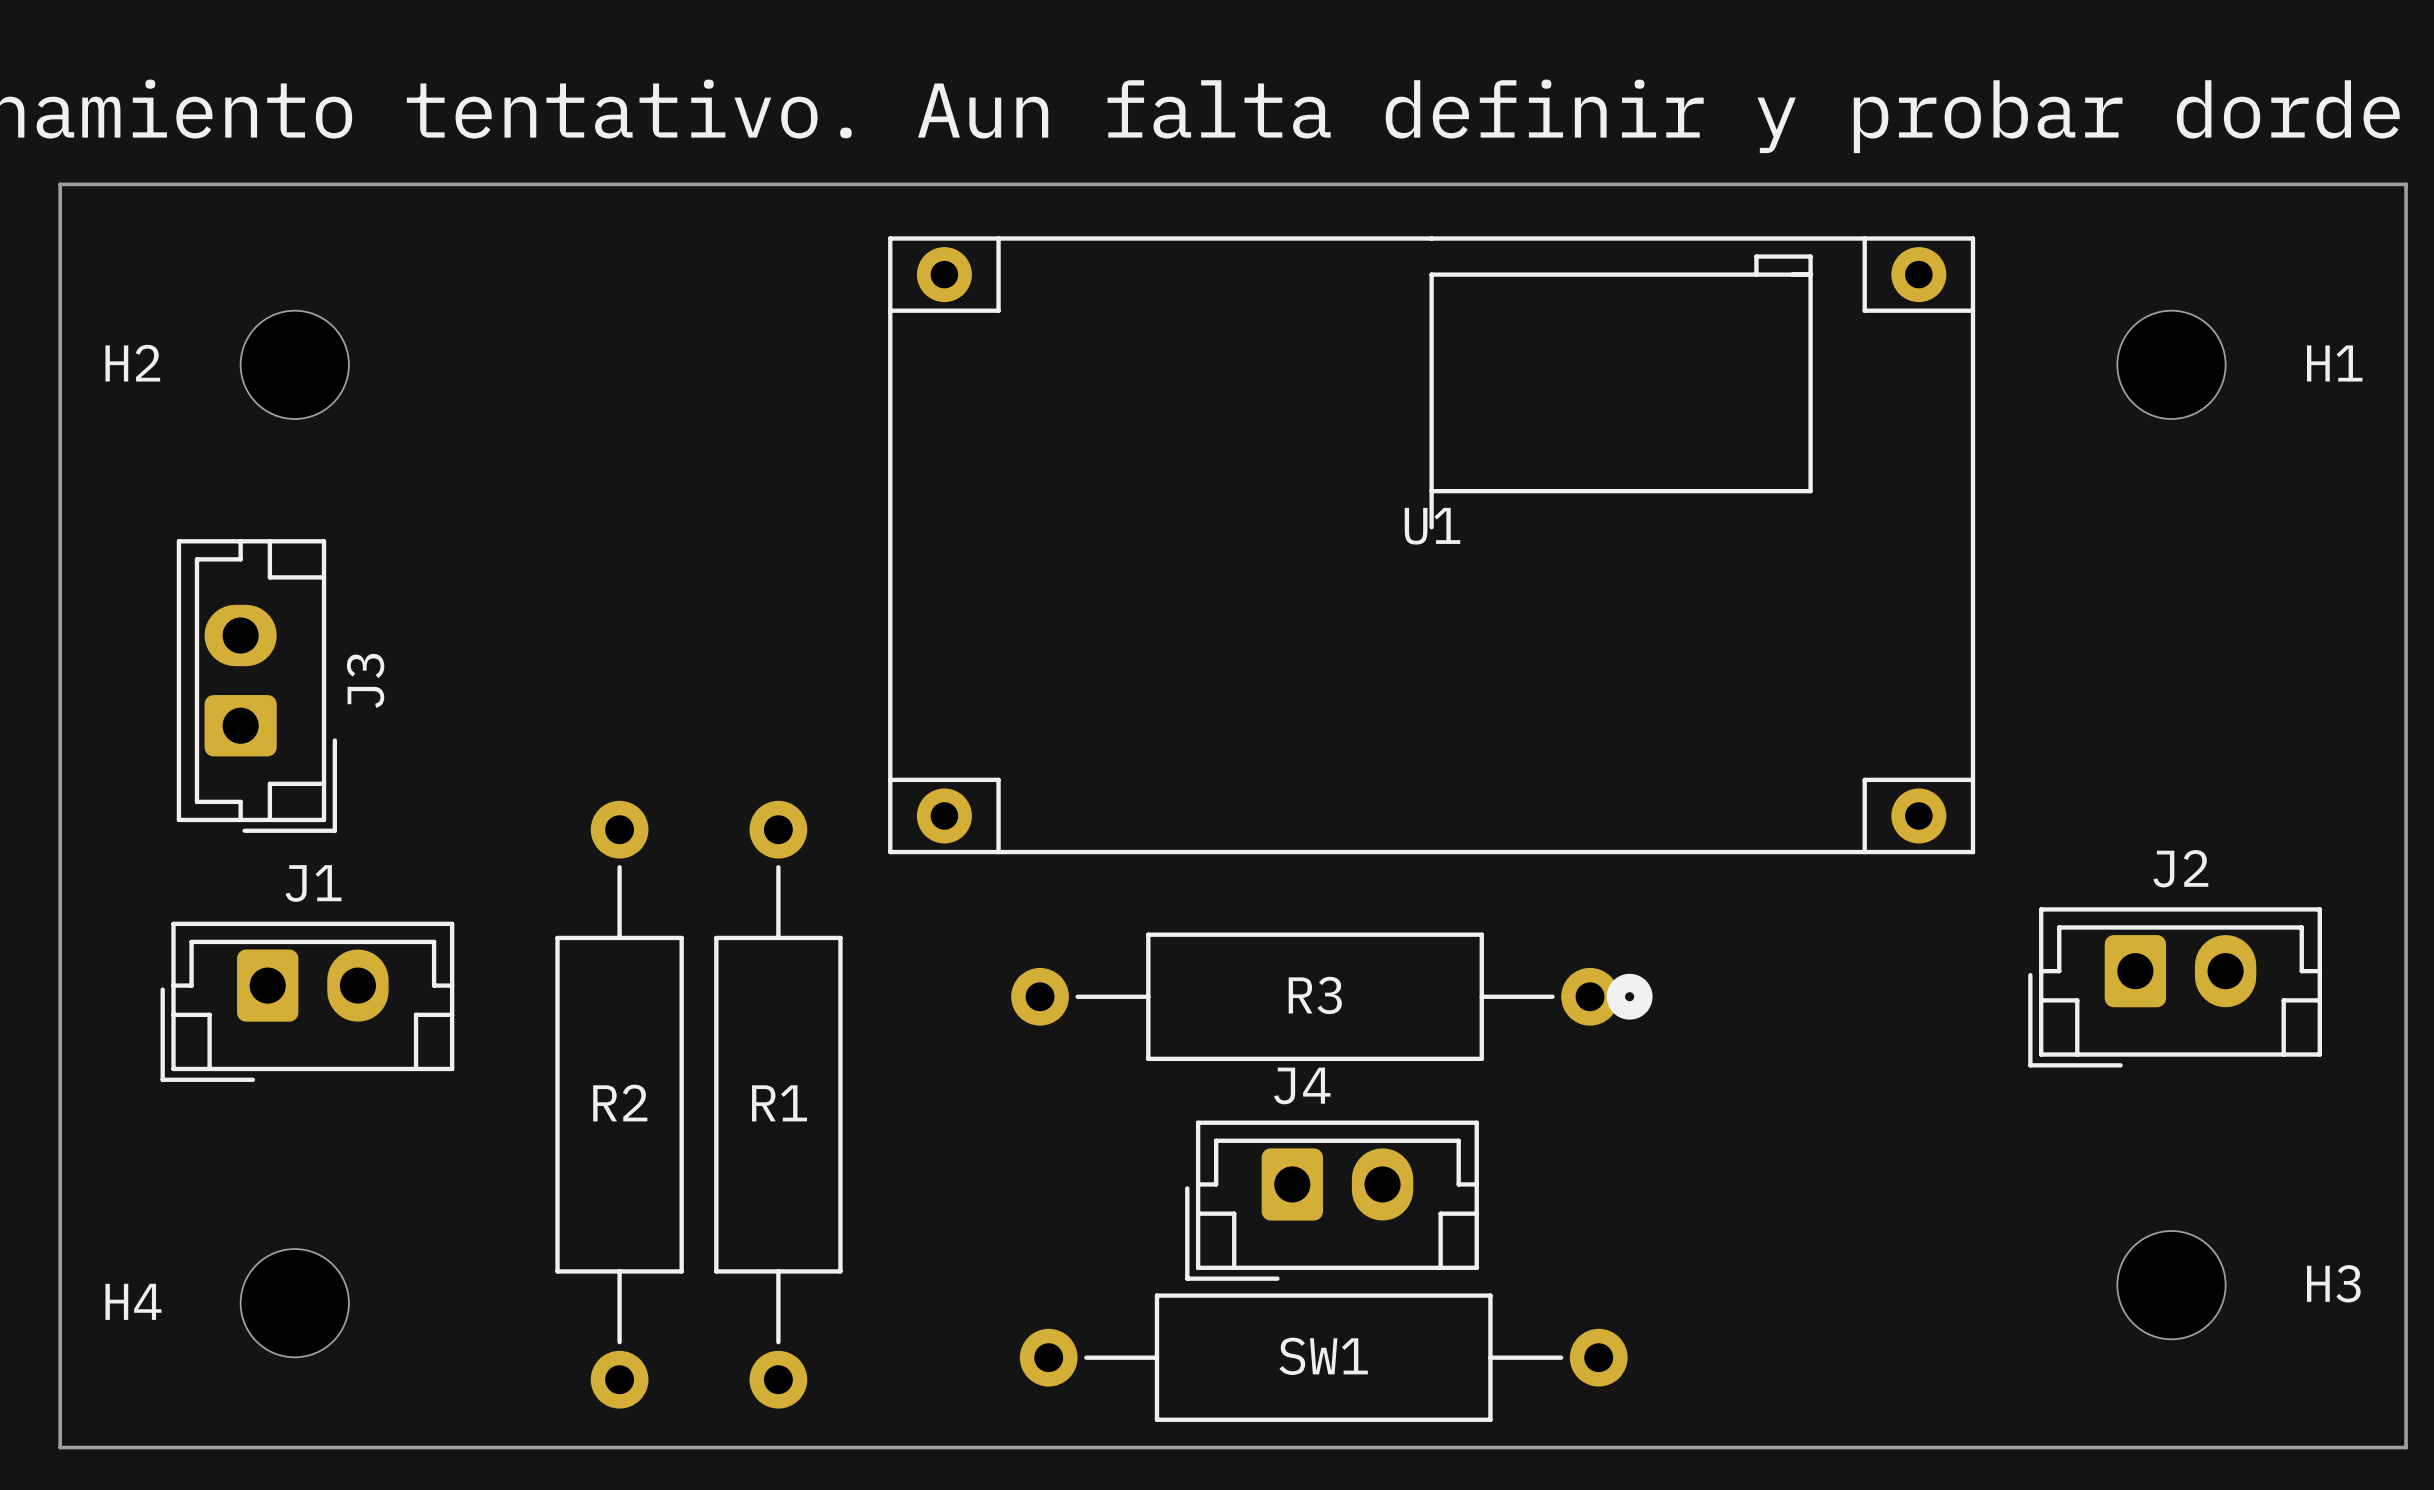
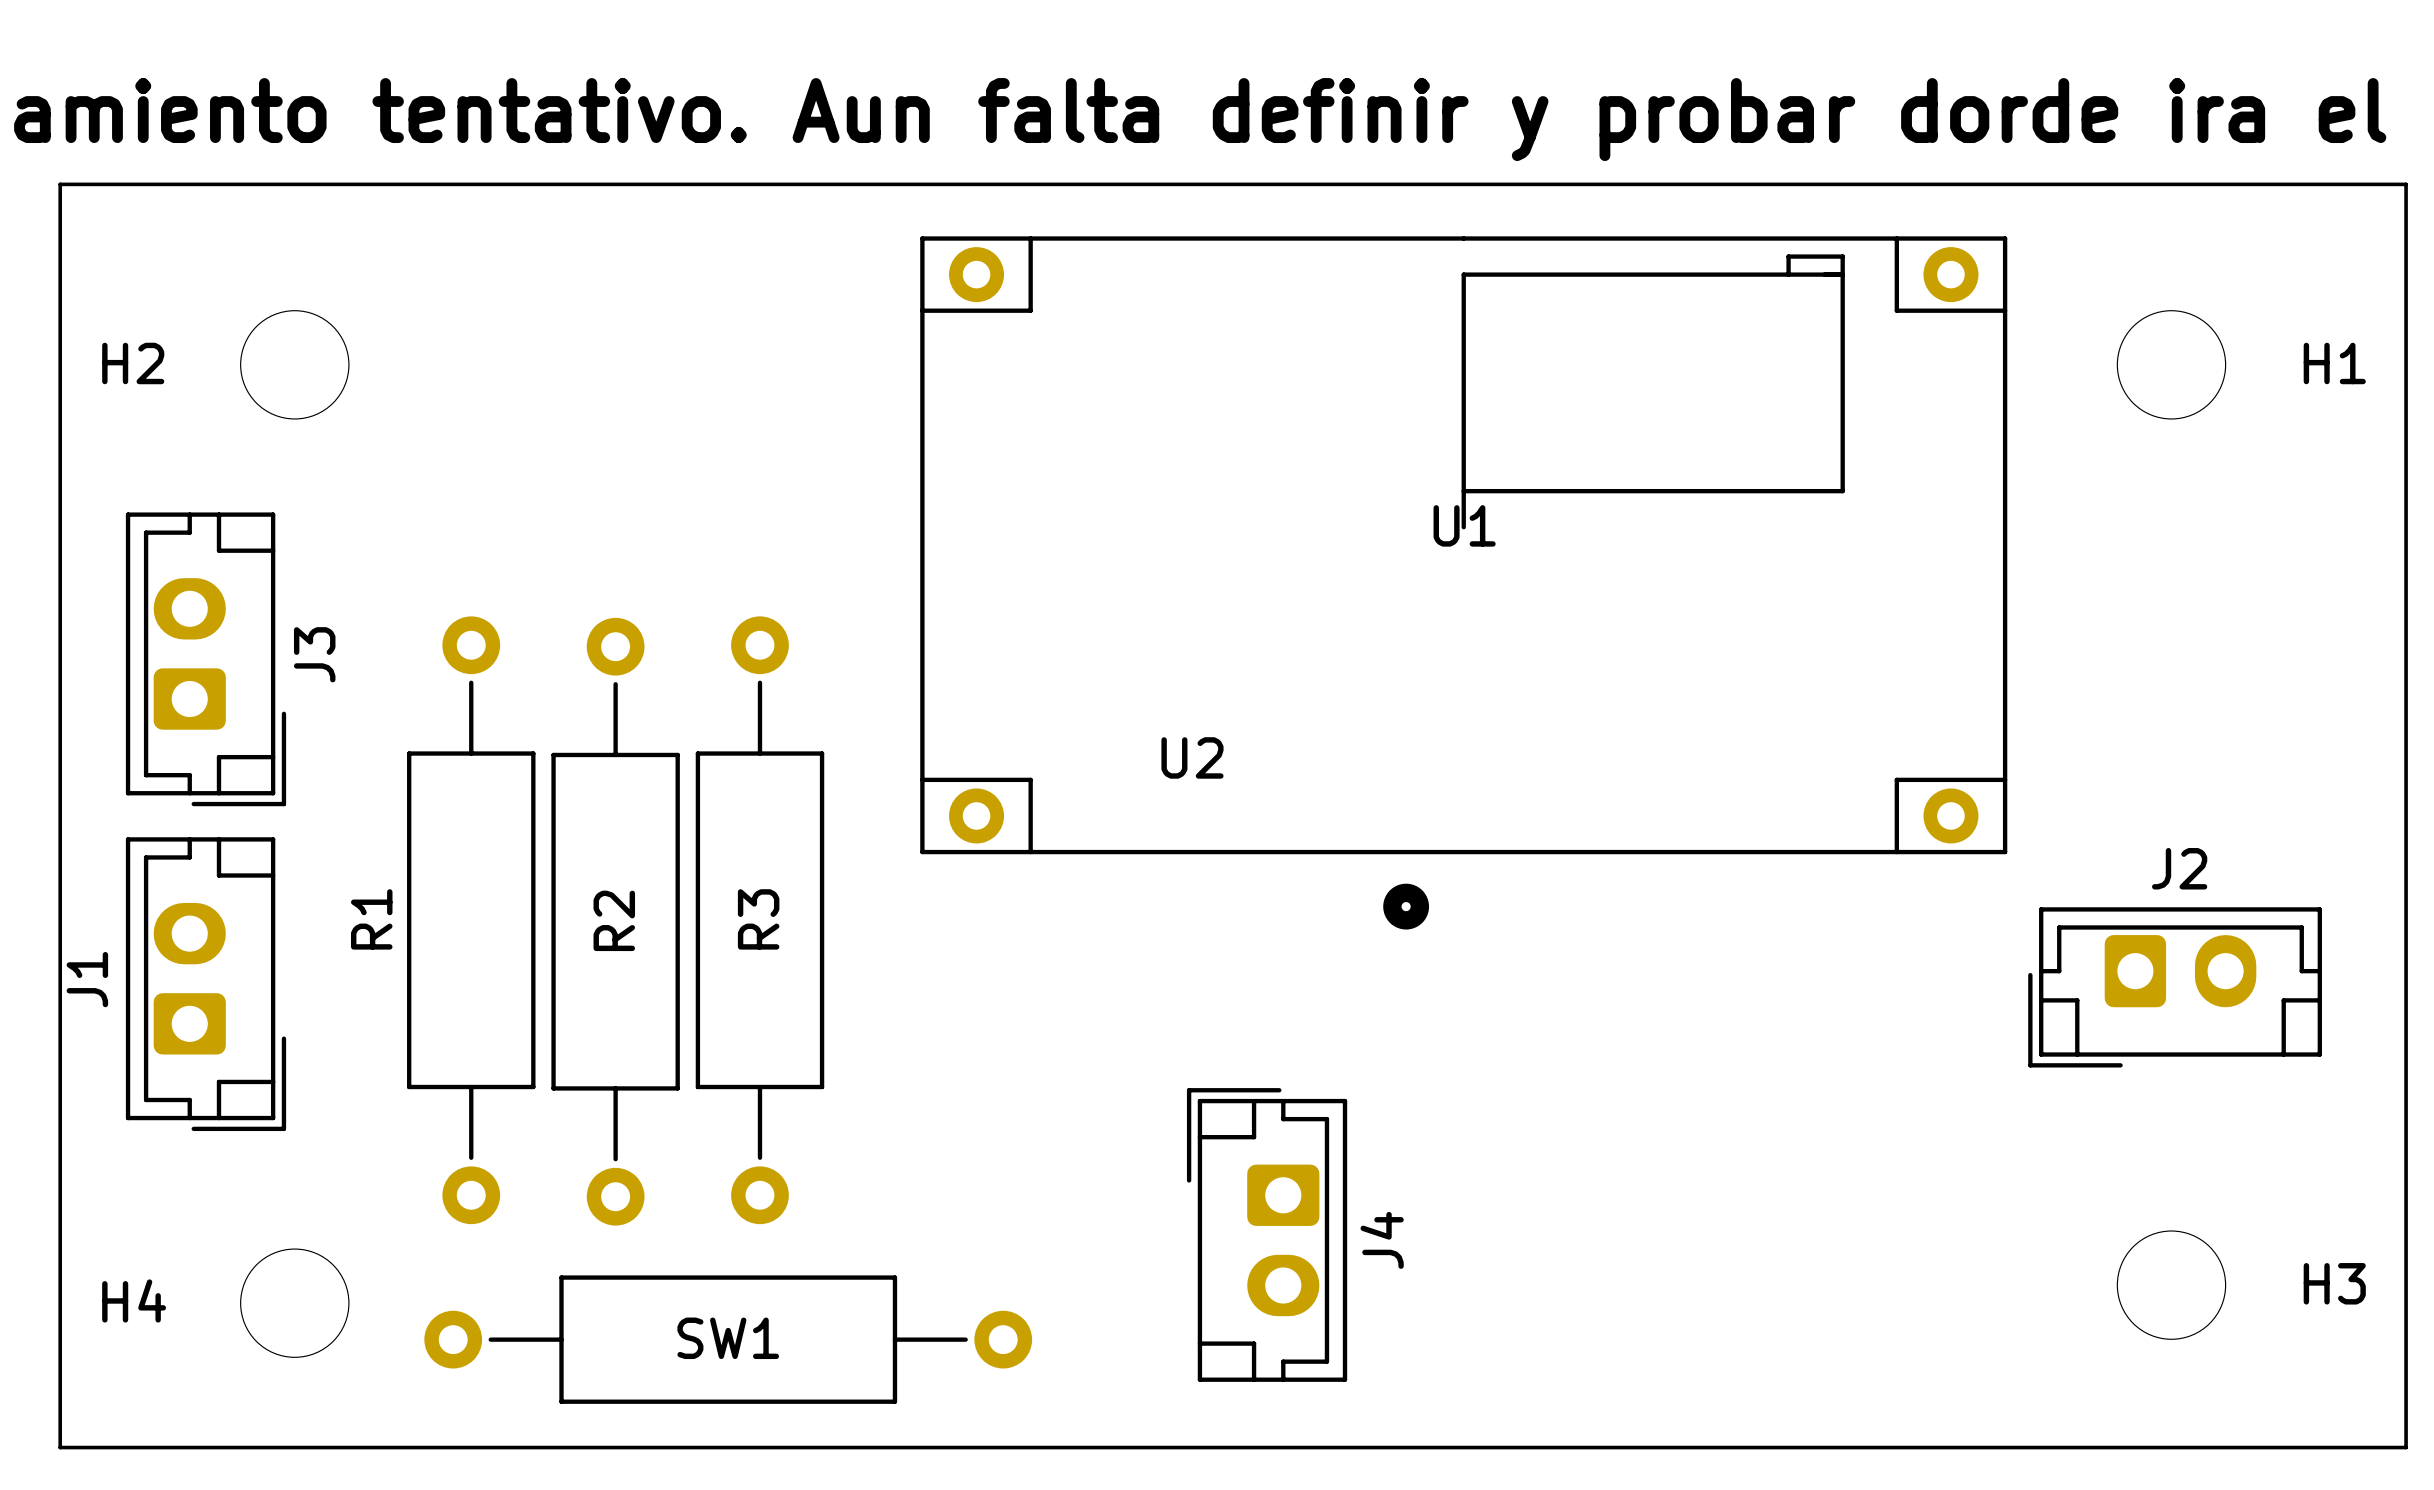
U1 position: (1431, 545) -> (1463, 545)
J3 position: (256, 686) -> (205, 659)
U2: none -> (1406, 906)
R3 rotation: 0° (1315, 996) -> 90° clockwise (759, 920)
R3 position: (1315, 996) -> (759, 920)
part: (1629, 996) -> none
J1 rotation: 0° (307, 1001) -> 90° counterclockwise (205, 984)
R2 name rotation: 0° (620, 1103) -> 90° counterclockwise (614, 920)
R1 name rotation: 0° (779, 1103) -> 90° counterclockwise (371, 919)
R1 name position: R1 (779, 1103) -> R1 (371, 919)
R2 position: (619, 1104) -> (615, 921)
R1 position: (778, 1104) -> (471, 920)
J4 rotation: 0° (1332, 1200) -> 90° clockwise (1267, 1234)
SW1 position: (1323, 1357) -> (728, 1339)

